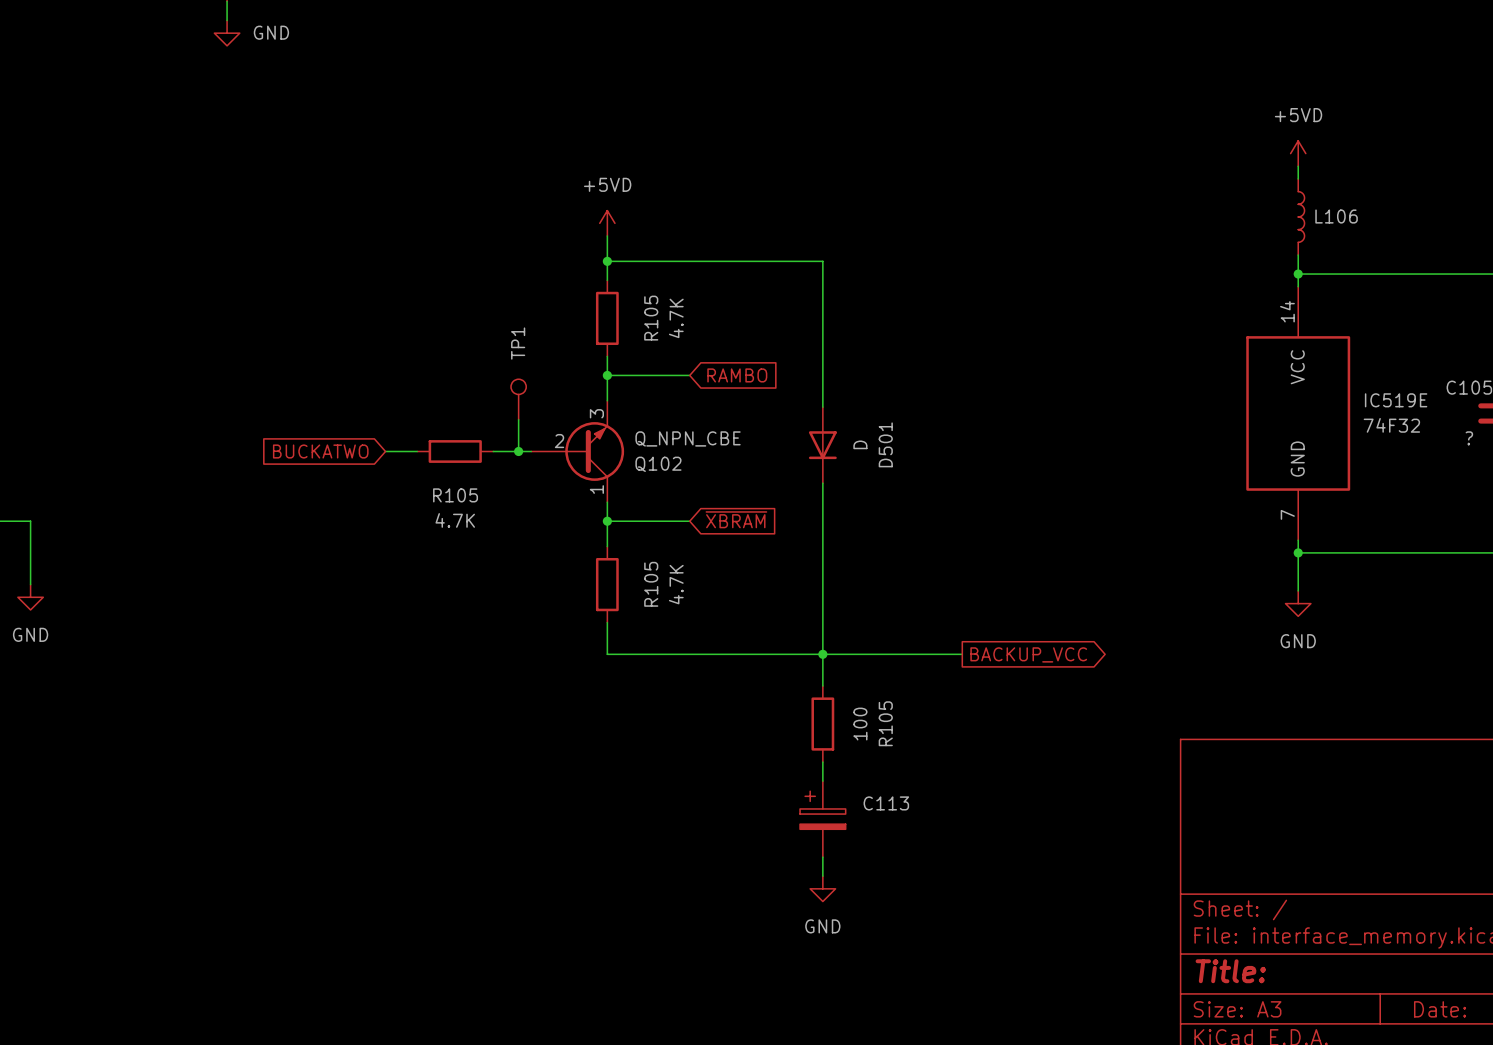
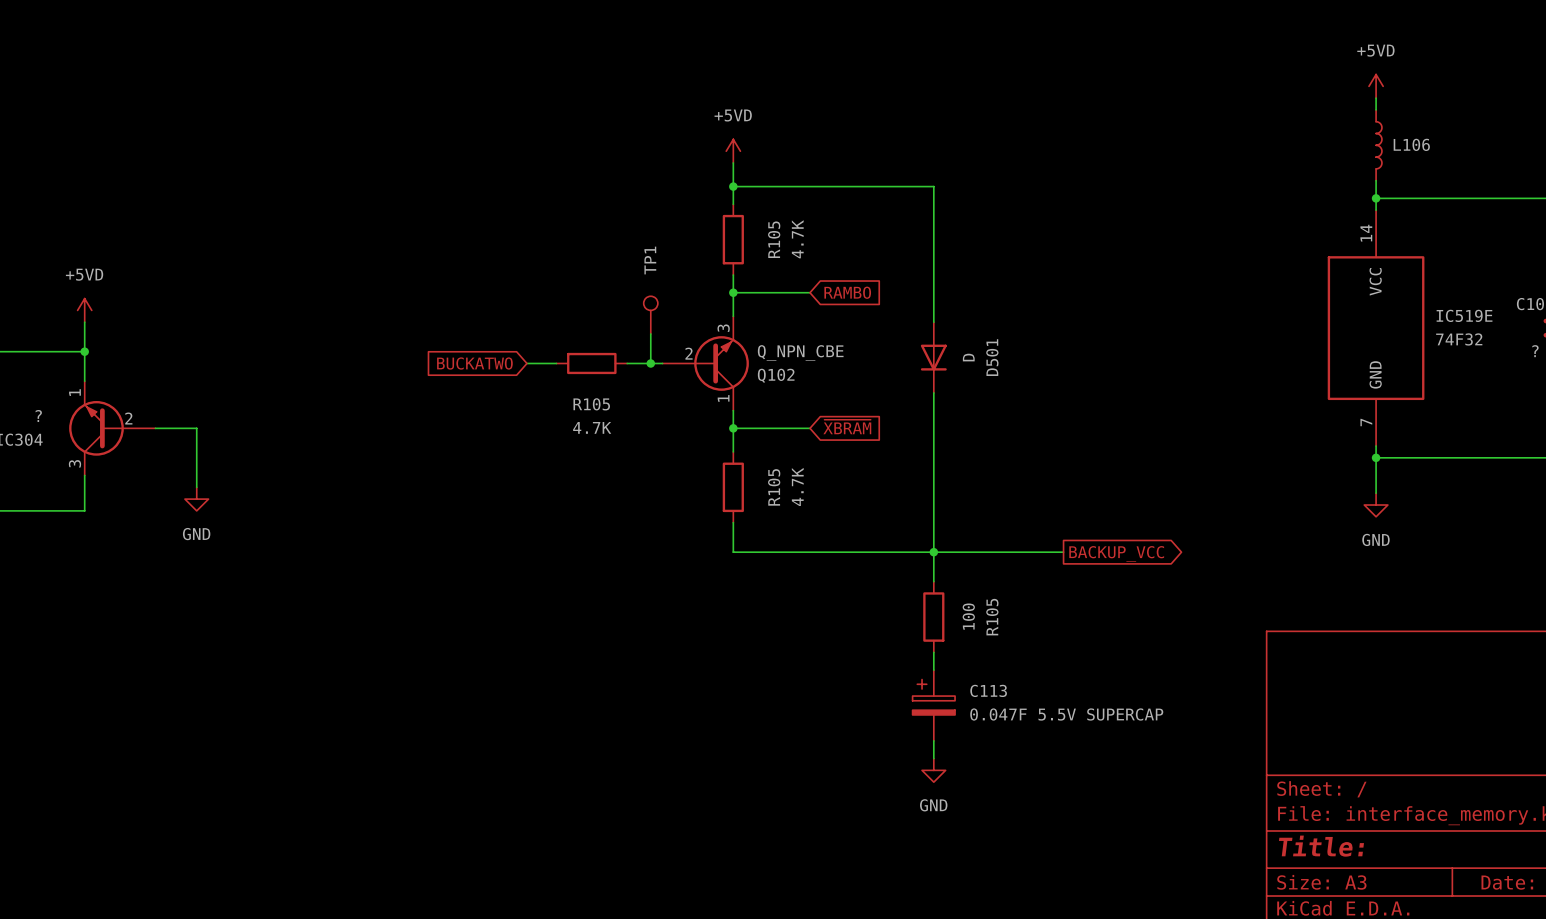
C113 value: none -> 0.047F 5.5V SUPERCAP (1066, 714)

